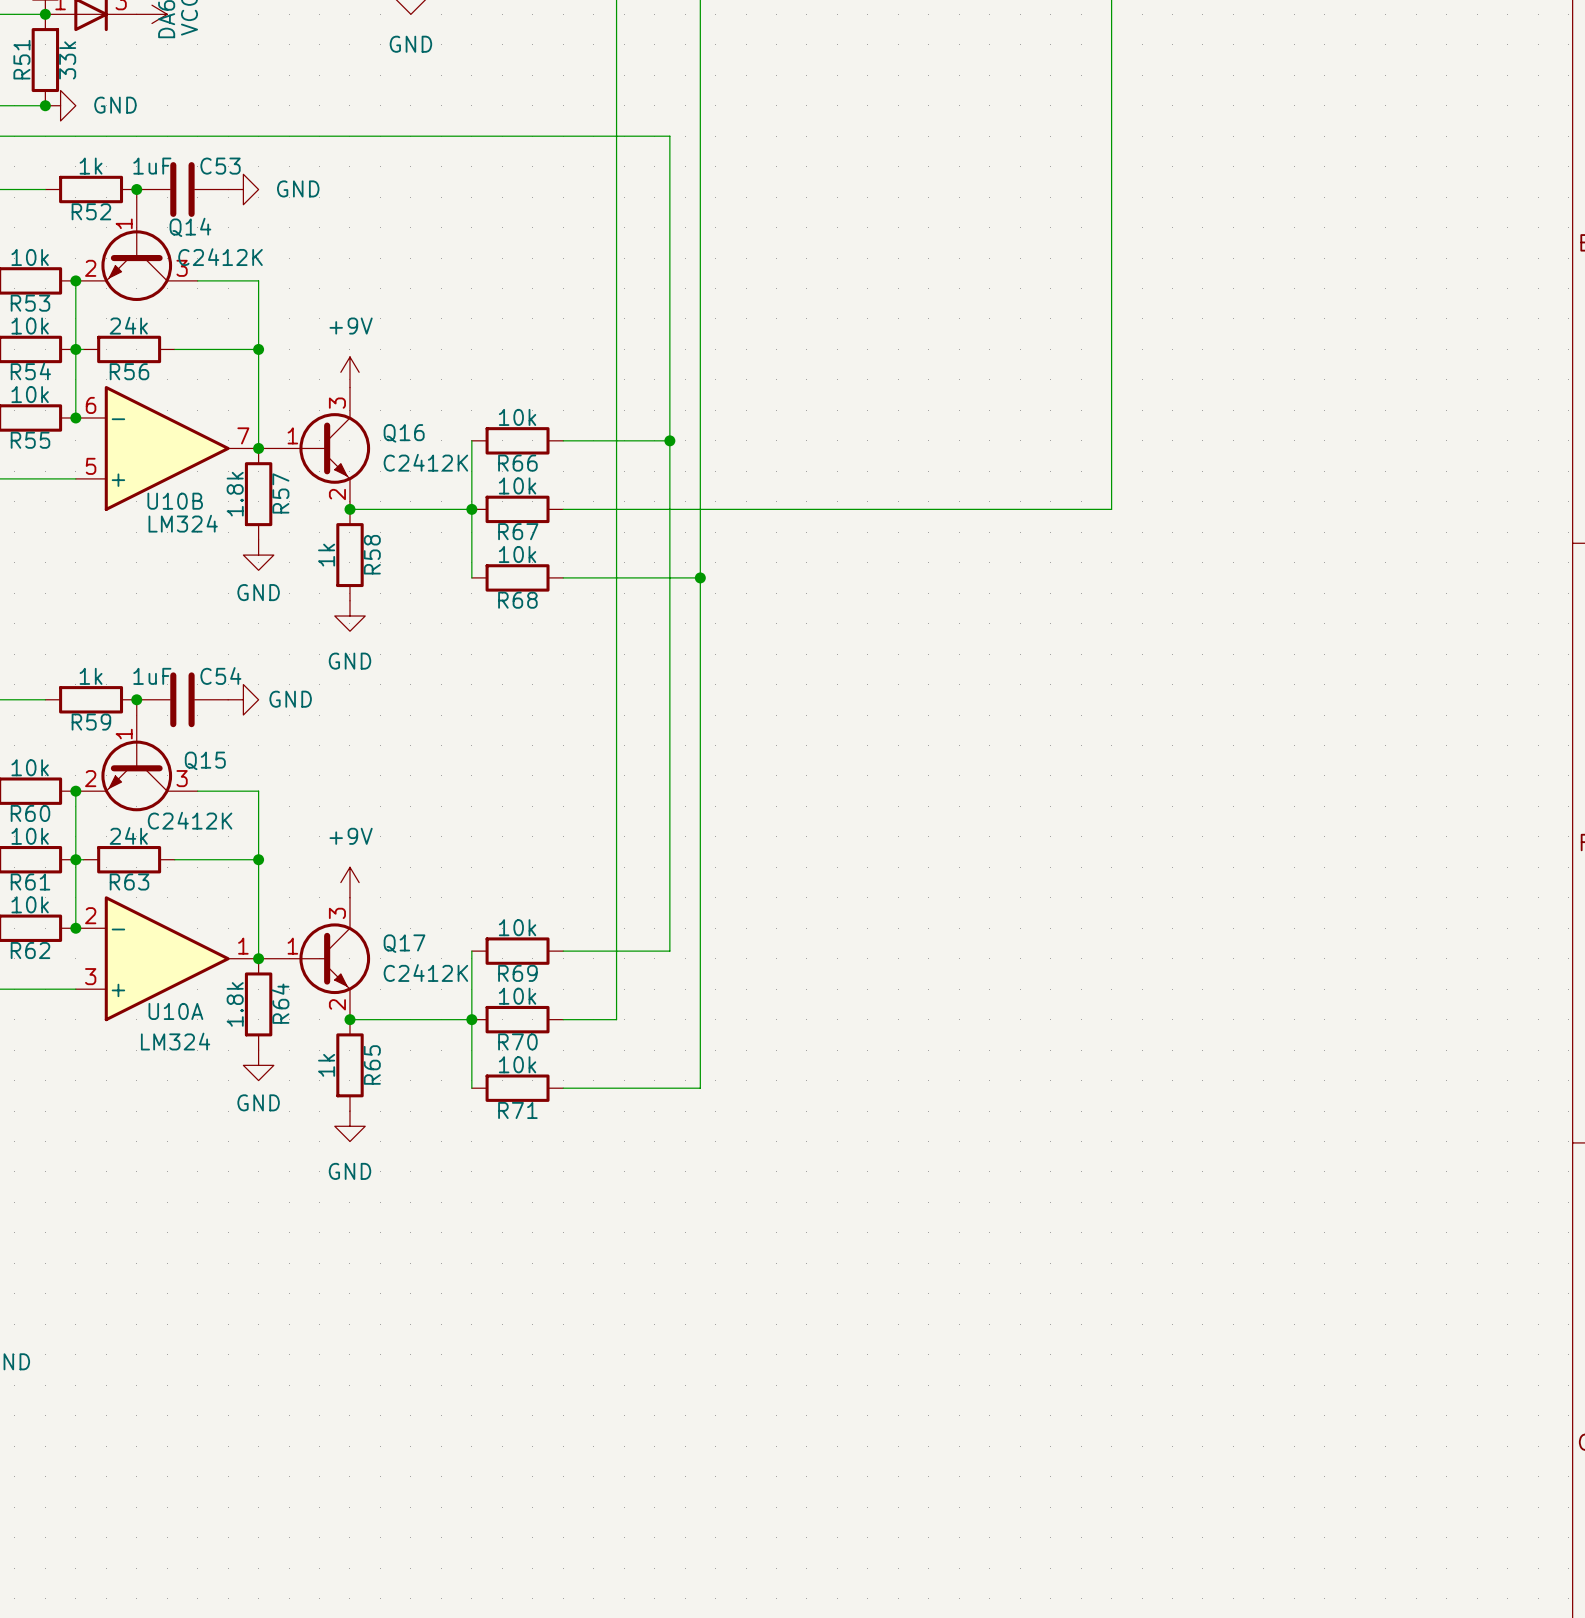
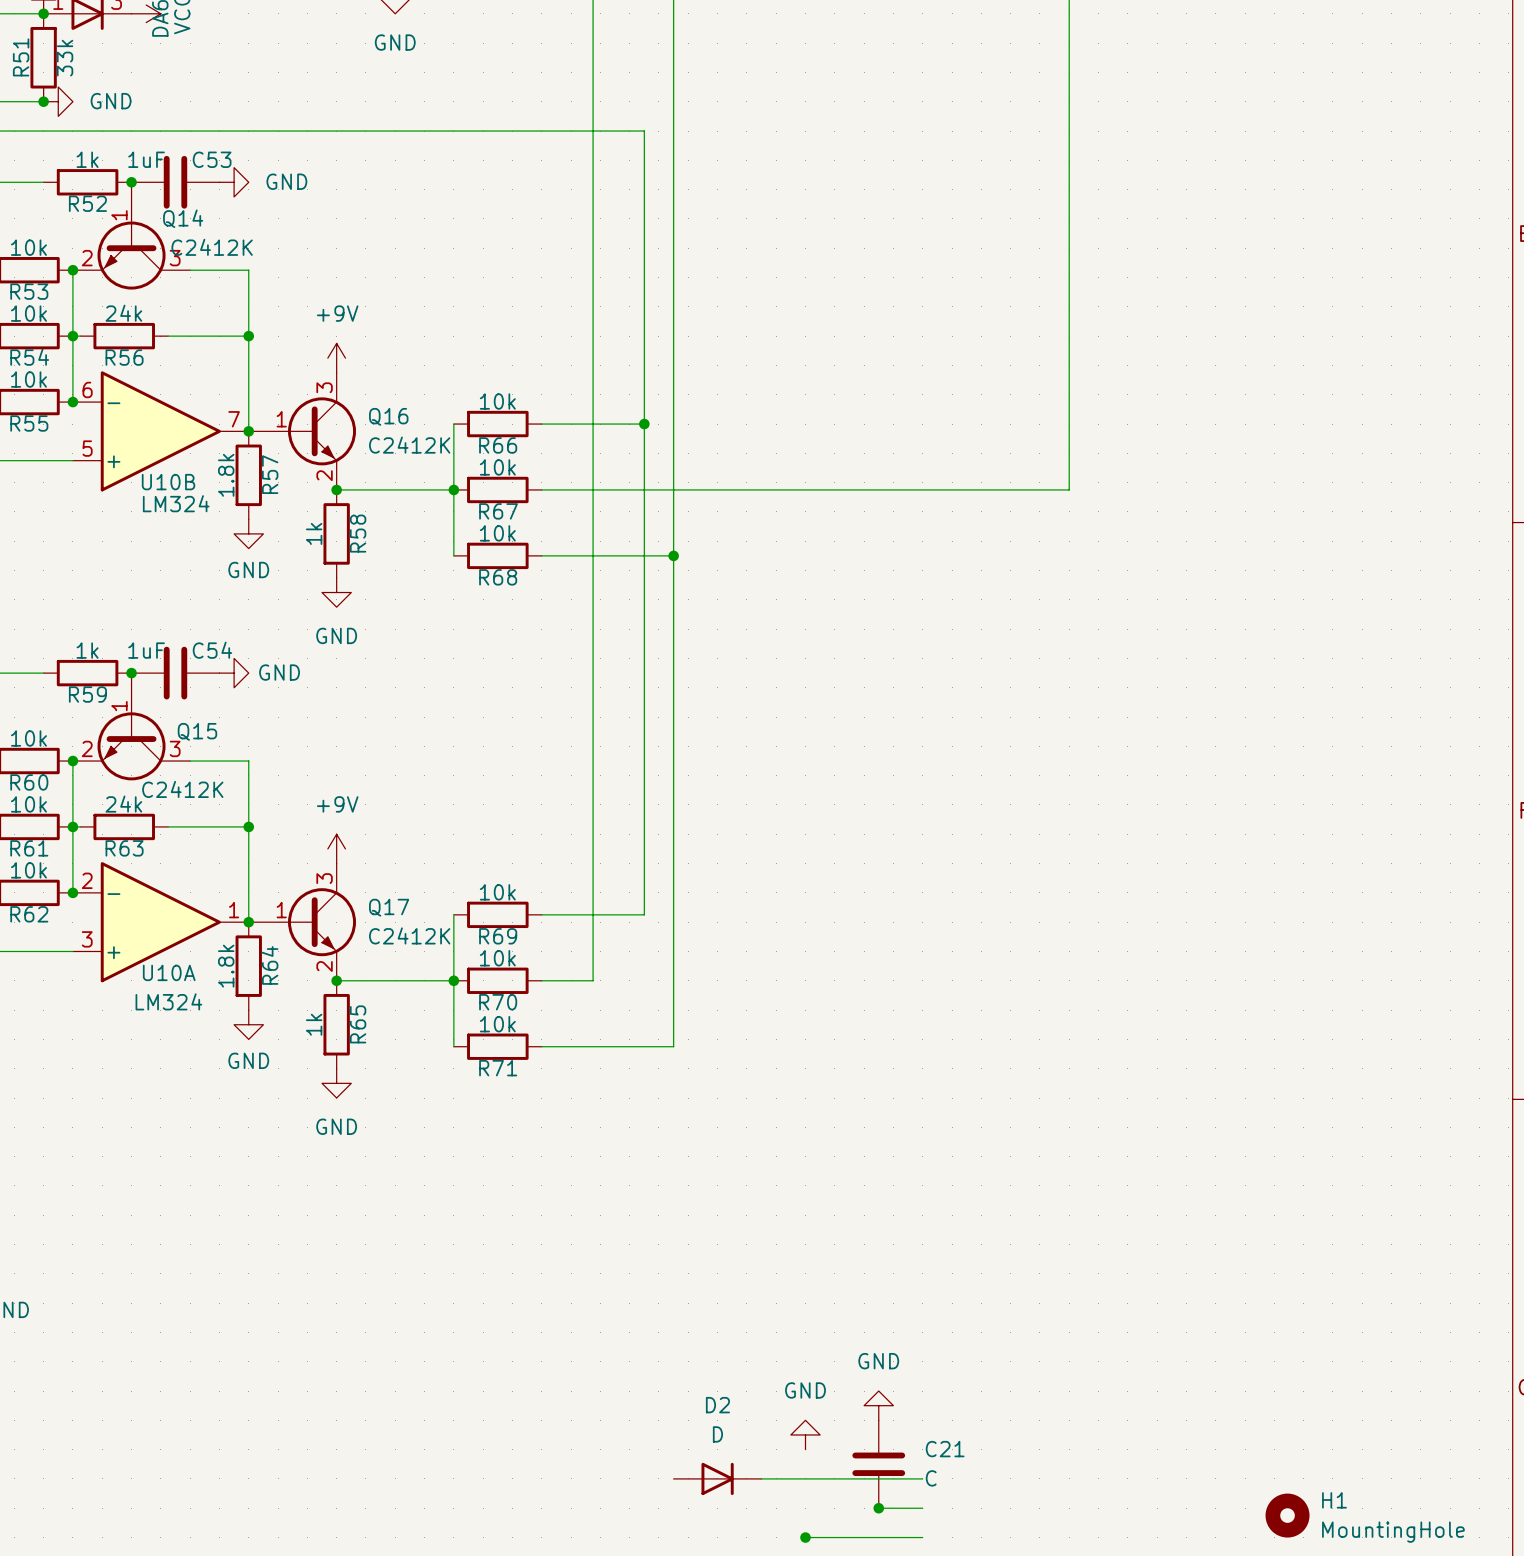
power symbol: none -> GND (878, 1405)
power symbol: none -> GND (805, 1434)
C21: none -> C (878, 1464)
D2: none -> D (717, 1478)
wire: none -> (761, 1478) (922, 1478)
wire: none -> (878, 1508) (922, 1508)
junction: none -> (878, 1508)
H1: none -> MountingHole (1287, 1515)
wire: none -> (805, 1537) (922, 1537)
junction: none -> (805, 1537)

